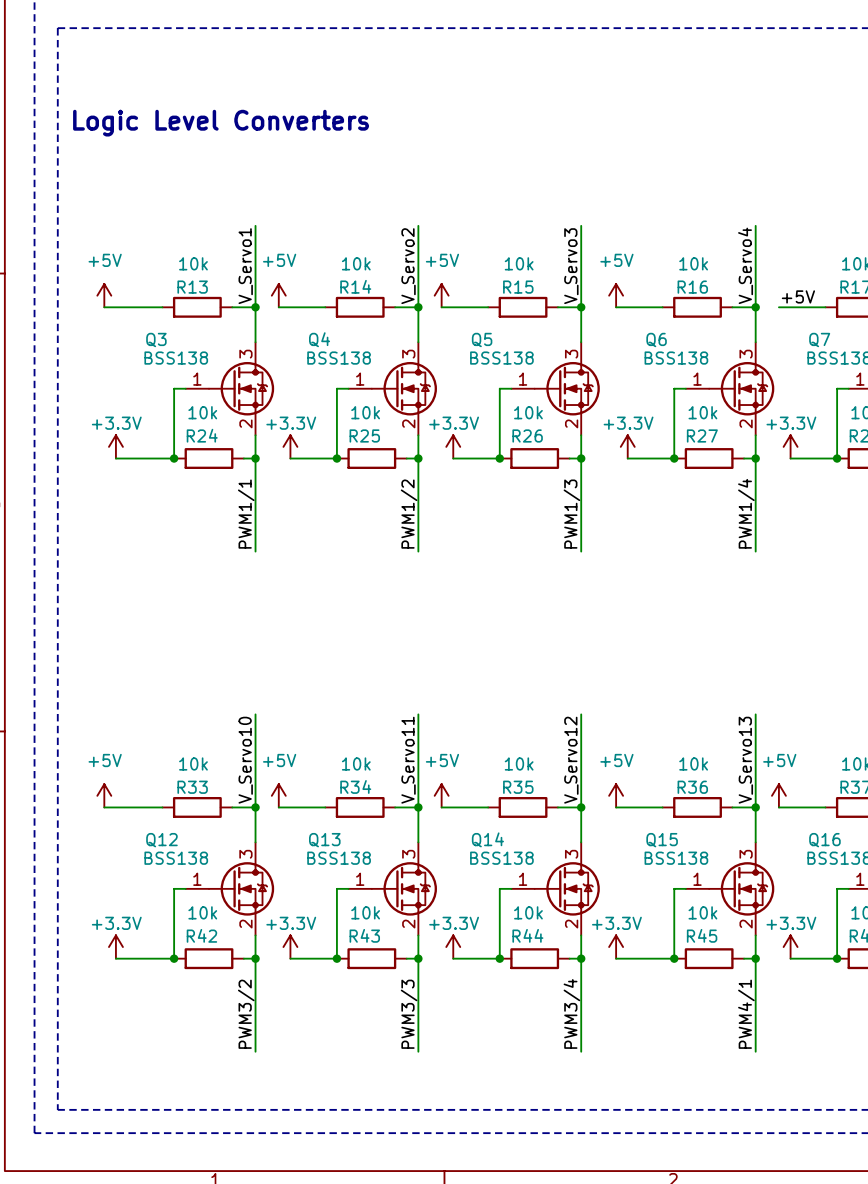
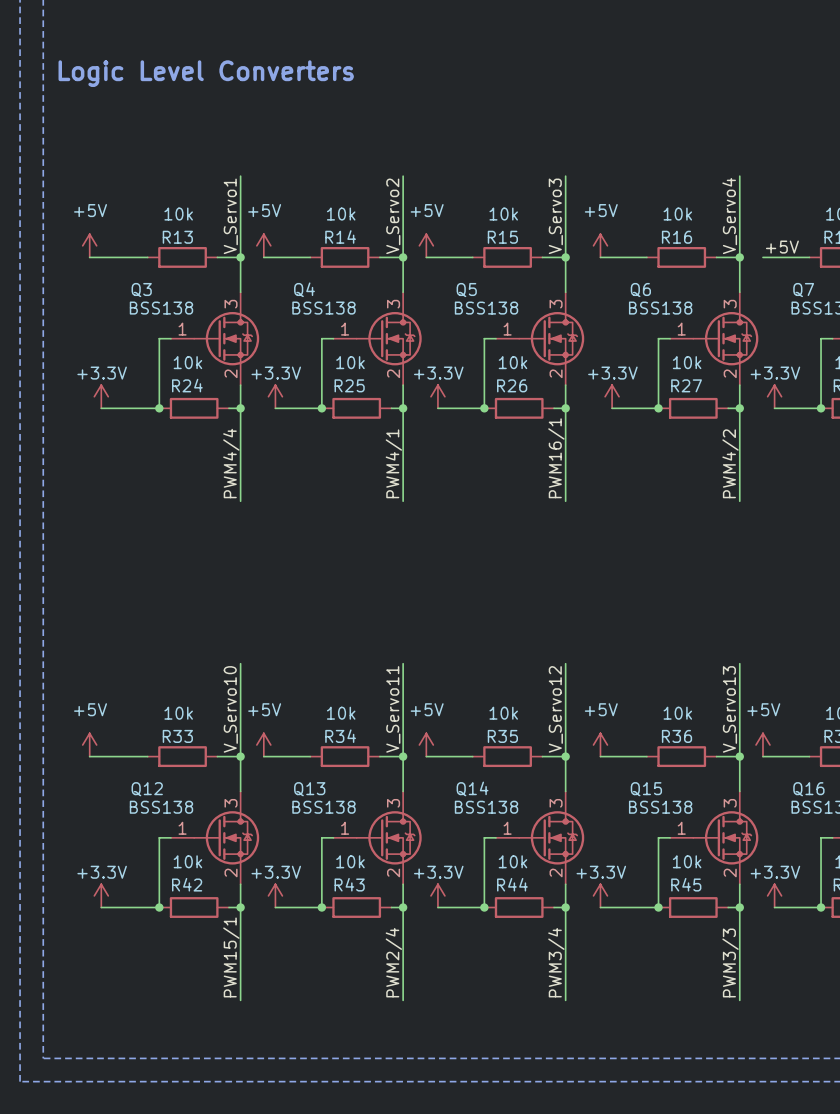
label: PWM1/4 (746, 513) -> PWM4/2 (730, 463)
label: PWM1/1 (246, 514) -> PWM4/4 (231, 463)
label: PWM1/2 (409, 514) -> PWM4/1 (393, 463)
label: PWM1/3 (571, 514) -> PWM16/1 (556, 458)
label: PWM3/2 (246, 1014) -> PWM15/1 (231, 957)
label: PWM3/3 (409, 1014) -> PWM2/4 (393, 962)
label: PWM4/1 (746, 1014) -> PWM3/3 (730, 962)

